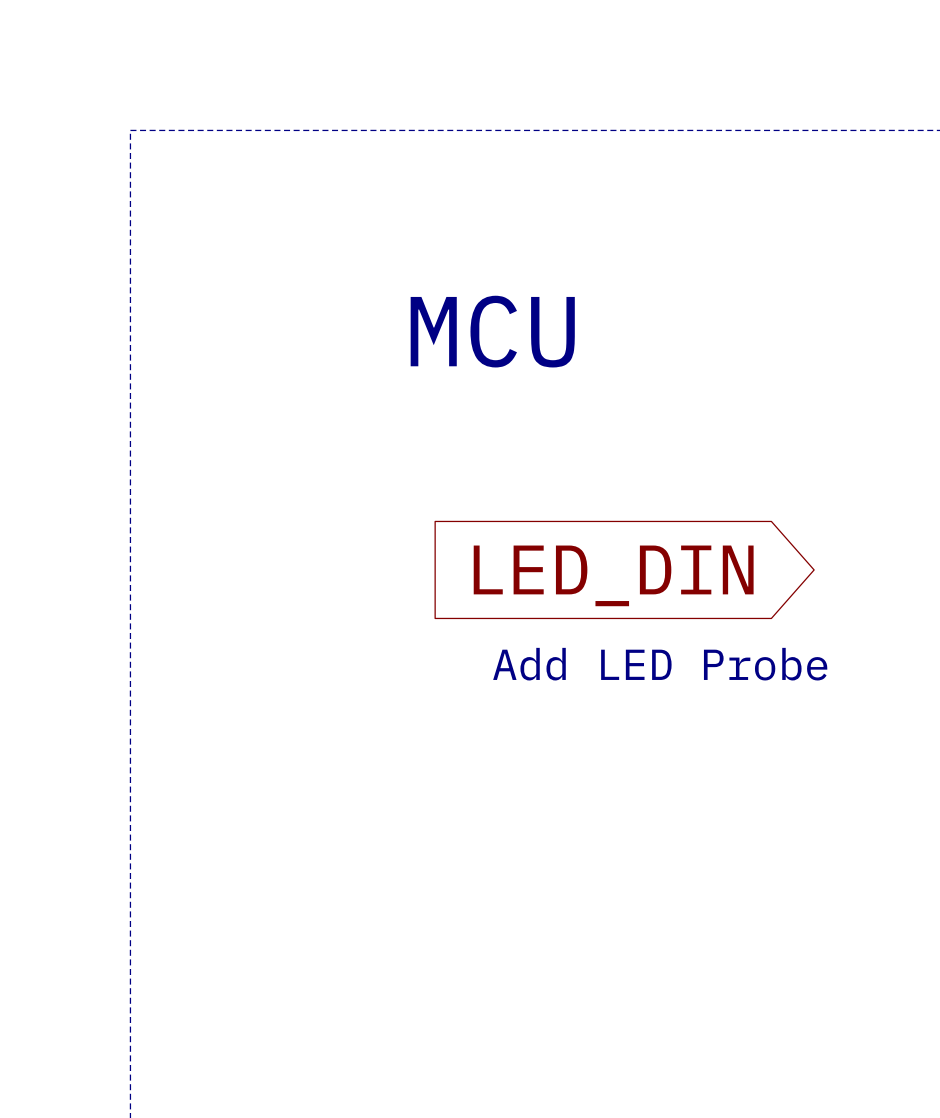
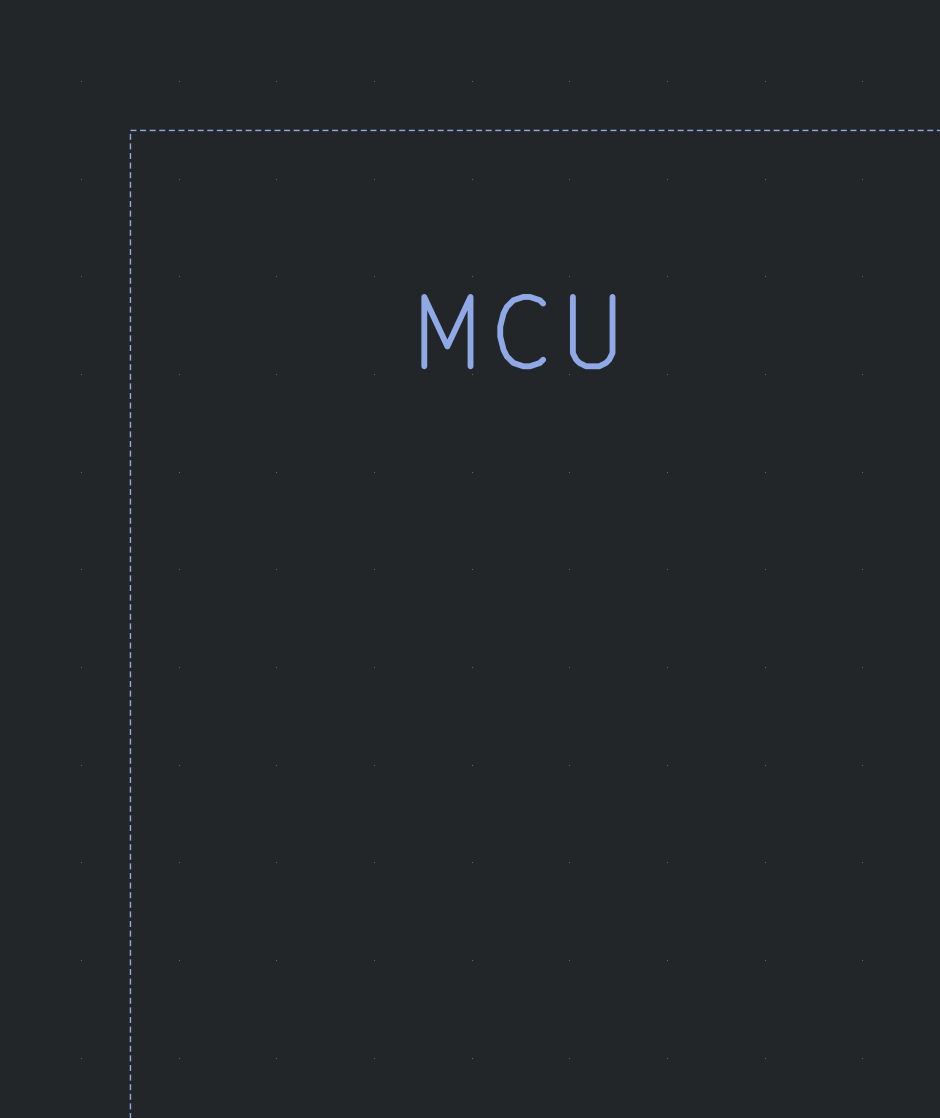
global label: LED_DIN (613, 575) -> none
text: Add LED Probe (660, 664) -> none

